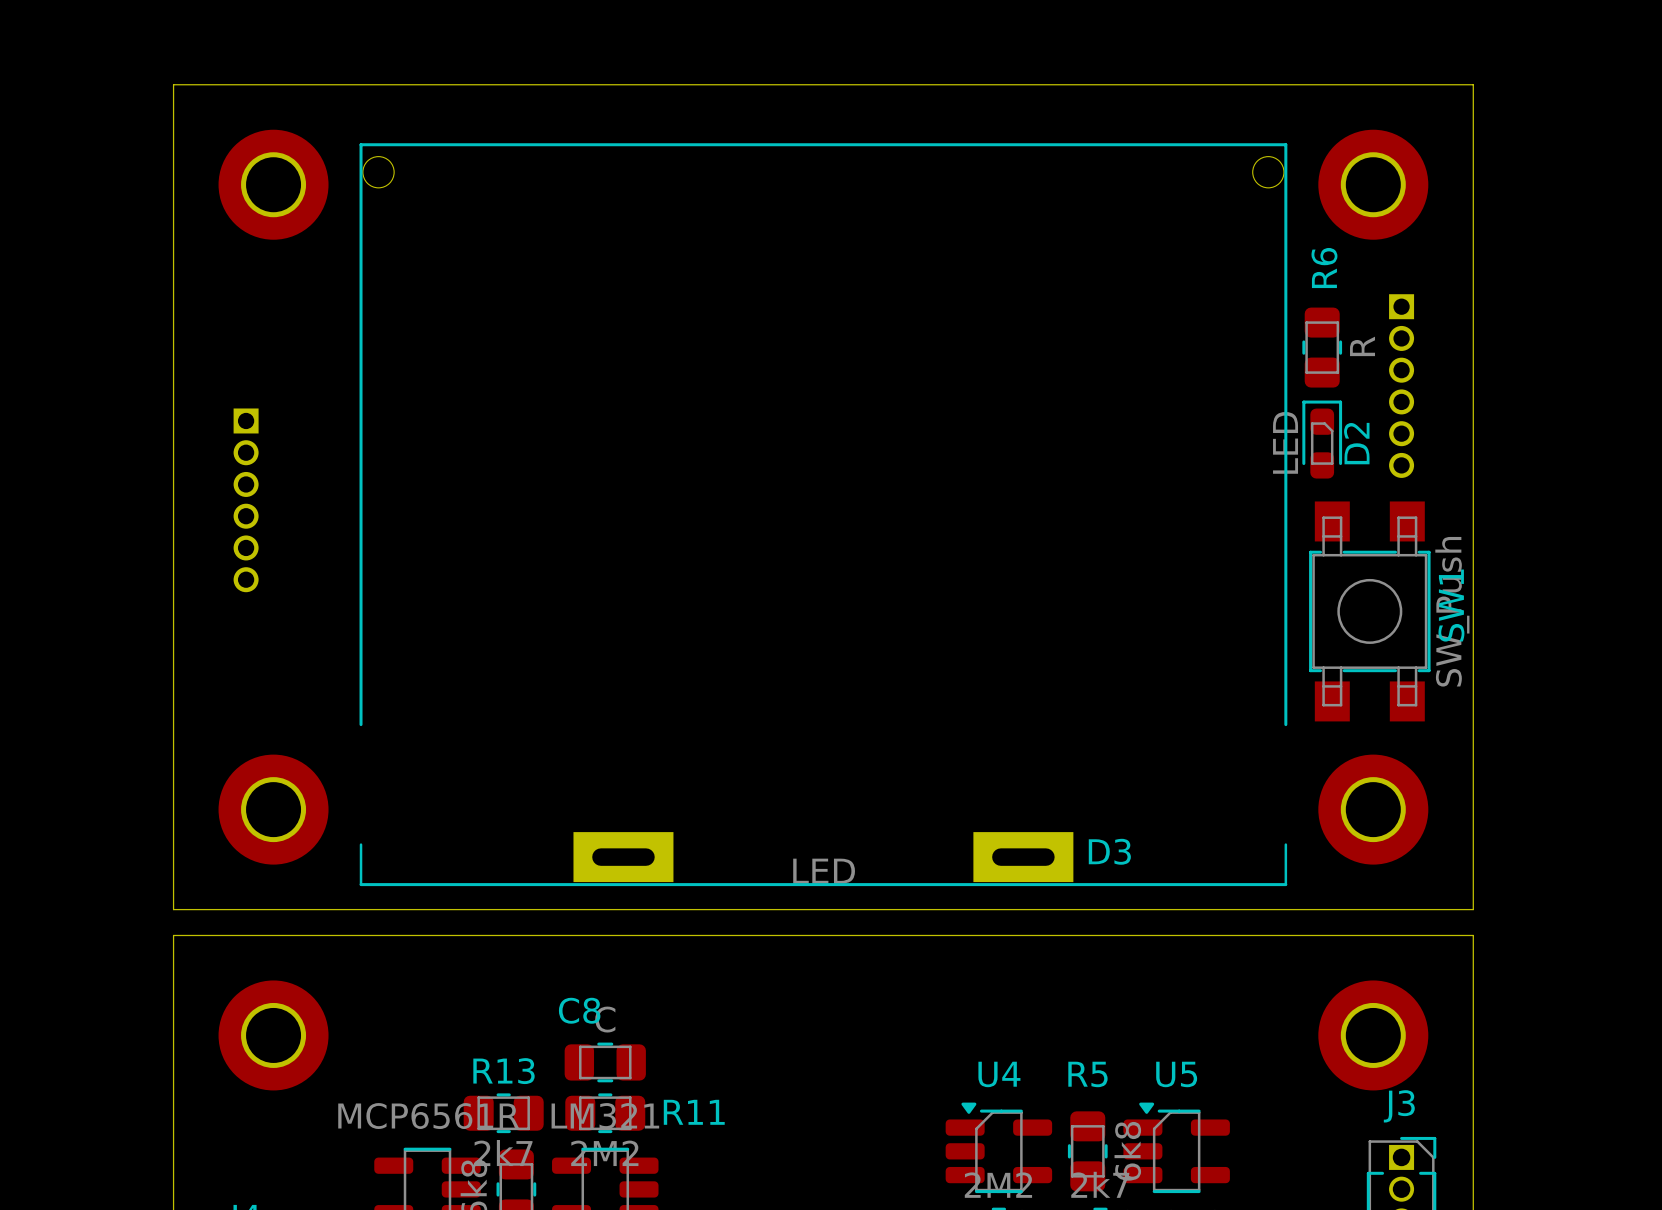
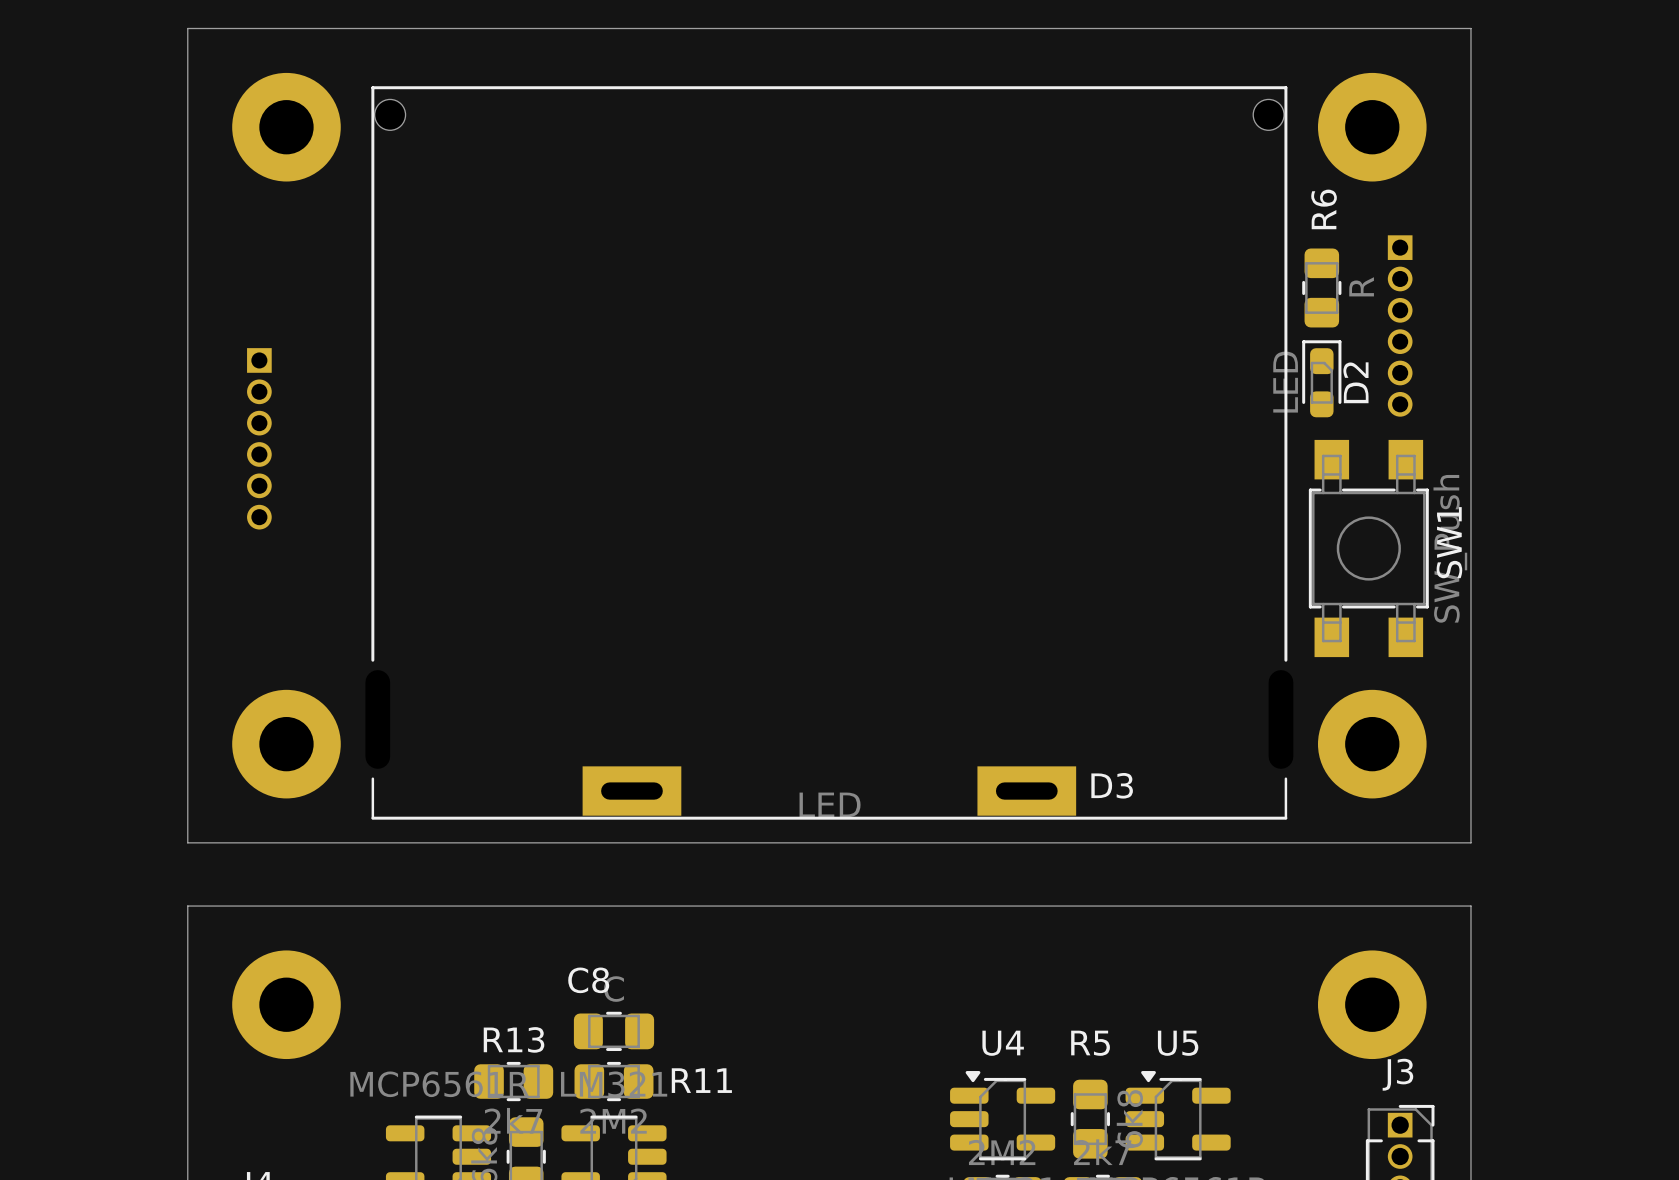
board edge: (173, 84) (1473, 84) -> (187, 66) (187, 28) (1470, 28) (1470, 66)
part position: (273, 184) -> (286, 127)
part position: (1373, 184) -> (1372, 127)
R6 position: (1322, 347) -> (1321, 287)
part position: (1401, 386) -> (1400, 325)
D2 position: (1322, 439) -> (1321, 378)
part position: (246, 500) -> (259, 438)
D3 position: (823, 514) -> (829, 452)
SW1 position: (1369, 611) -> (1368, 548)
part position: (273, 809) -> (286, 744)
part position: (1373, 809) -> (1372, 744)
board edge: (173, 871) (173, 909) (1473, 909) (1473, 871) -> (187, 842) (1470, 842)

